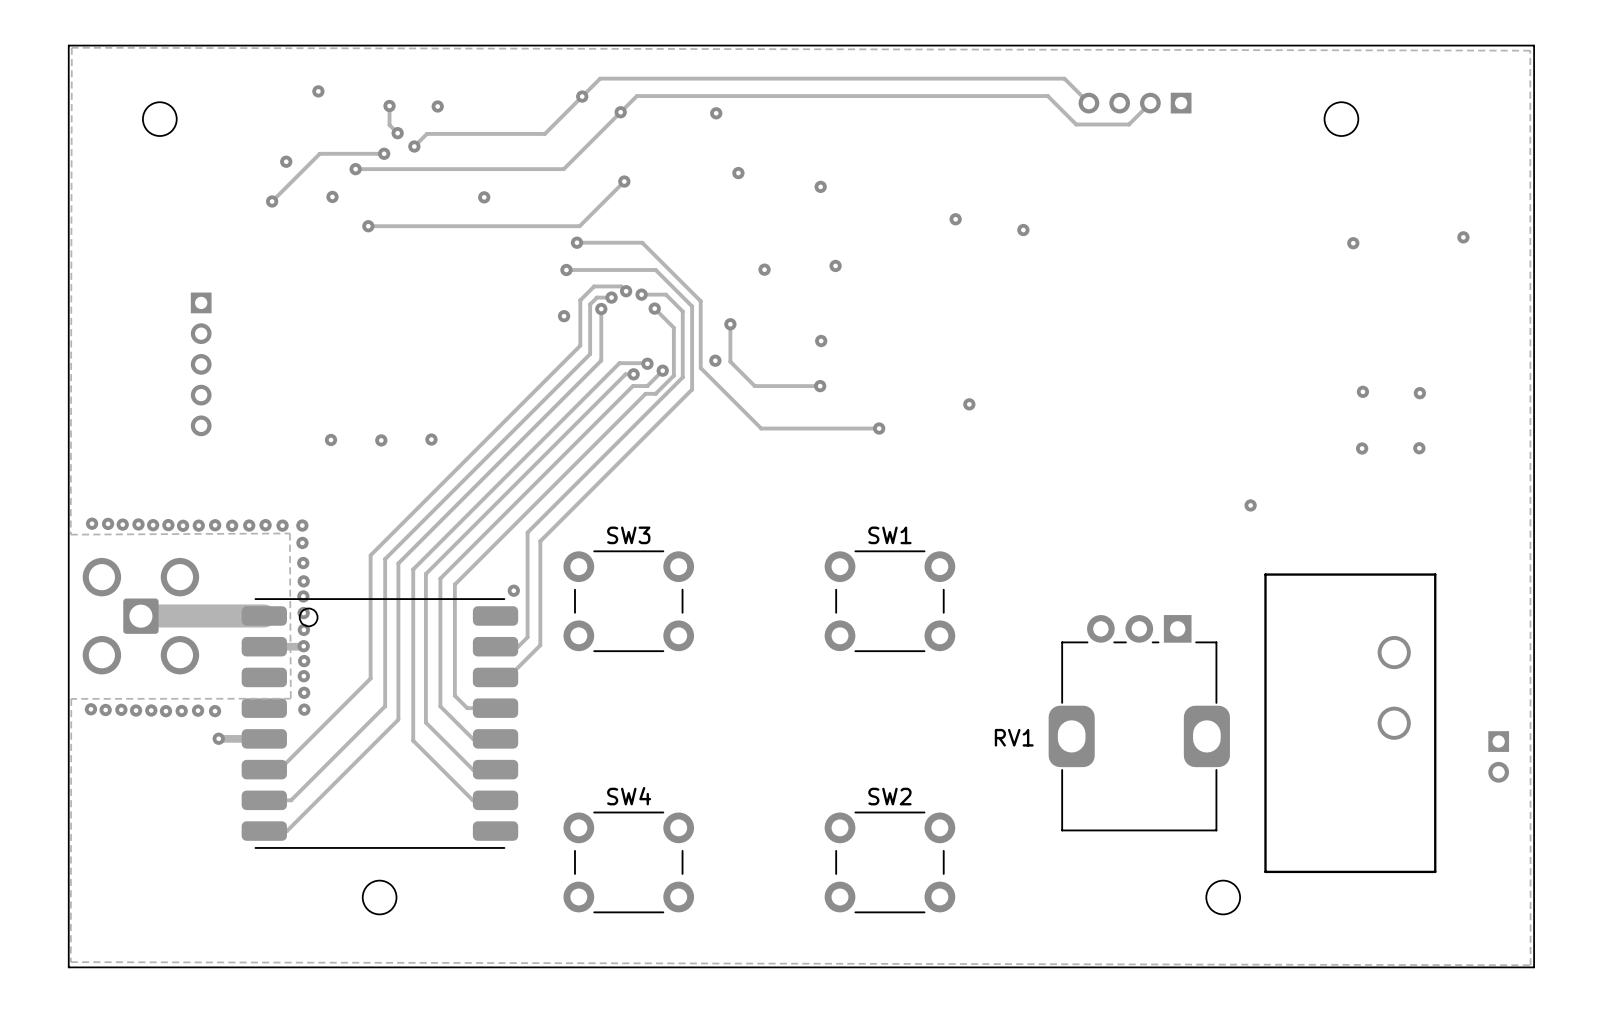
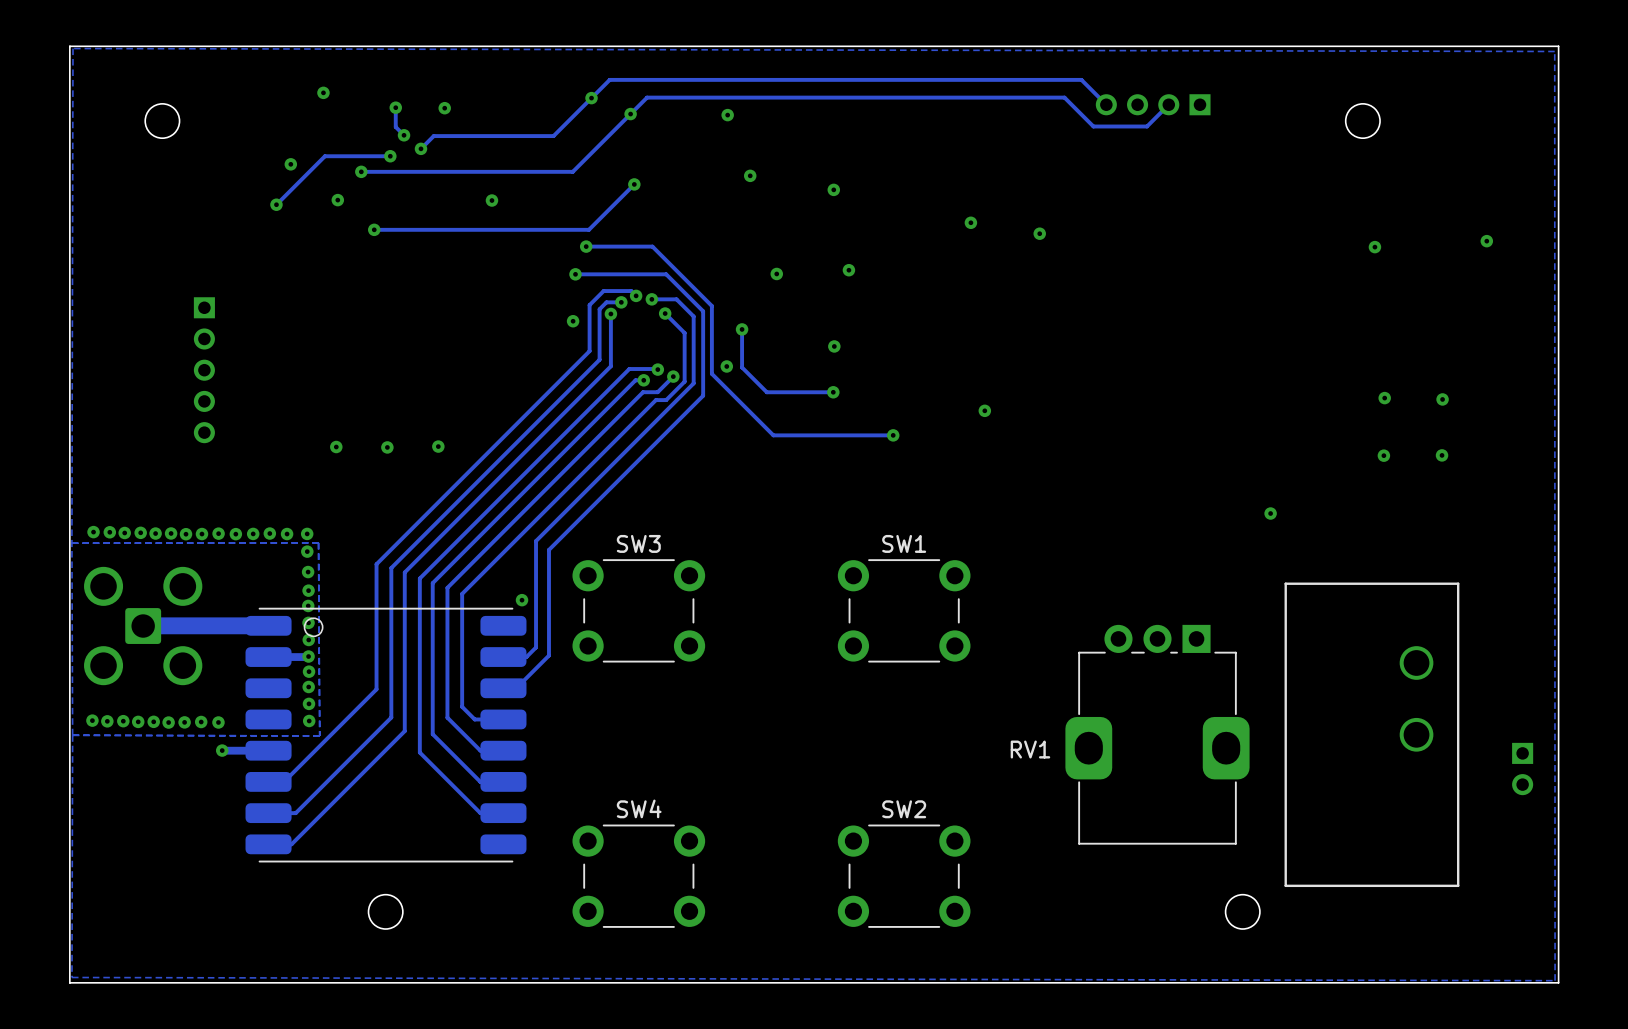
zone outline: (70, 534) (289, 533) (290, 698) (71, 698) (70, 962) -> (72, 735) (71, 977)
track width: thick (264, 615) (141, 615) -> thin (268, 625) (143, 625)
zone outline: none -> (72, 735) (319, 735) (318, 542) (71, 543) (72, 735)

